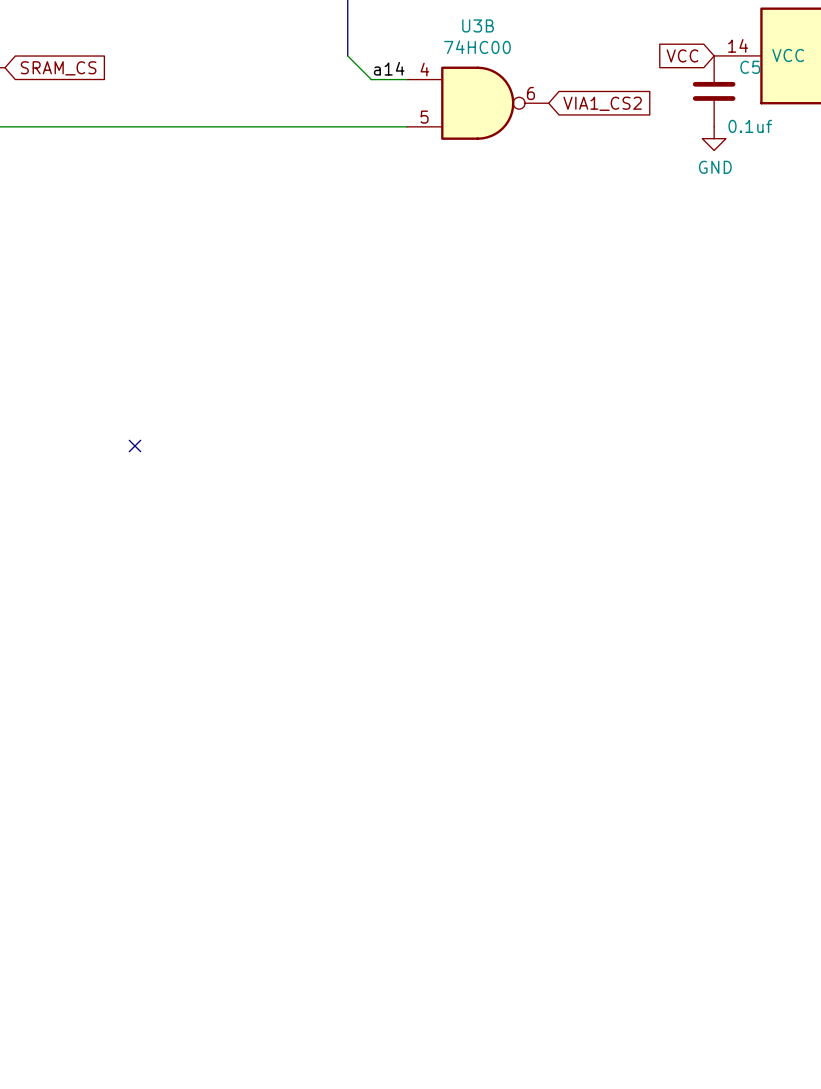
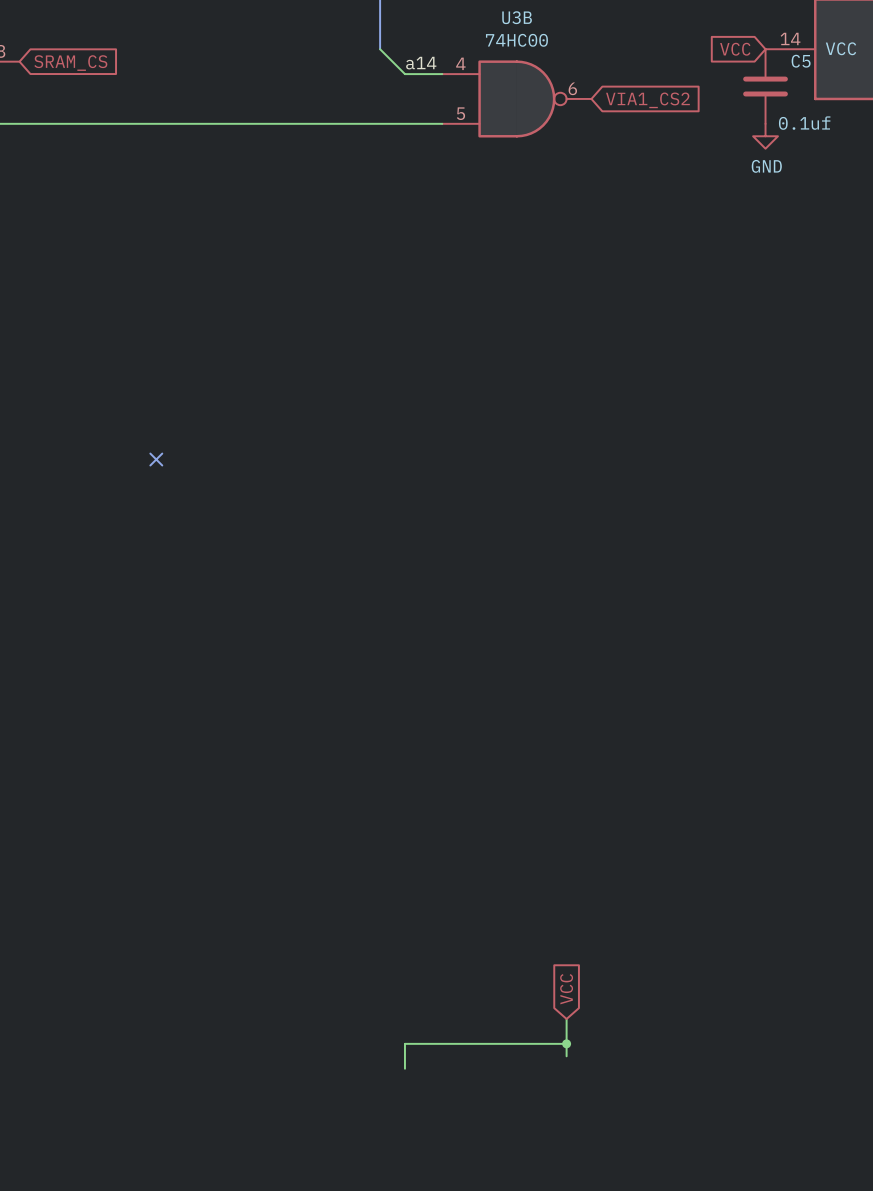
global label: none -> VCC (566, 989)
wire: none -> (566, 1019) (566, 1056)
wire: none -> (566, 1043) (404, 1043) (404, 1068)
junction: none -> (566, 1043)

